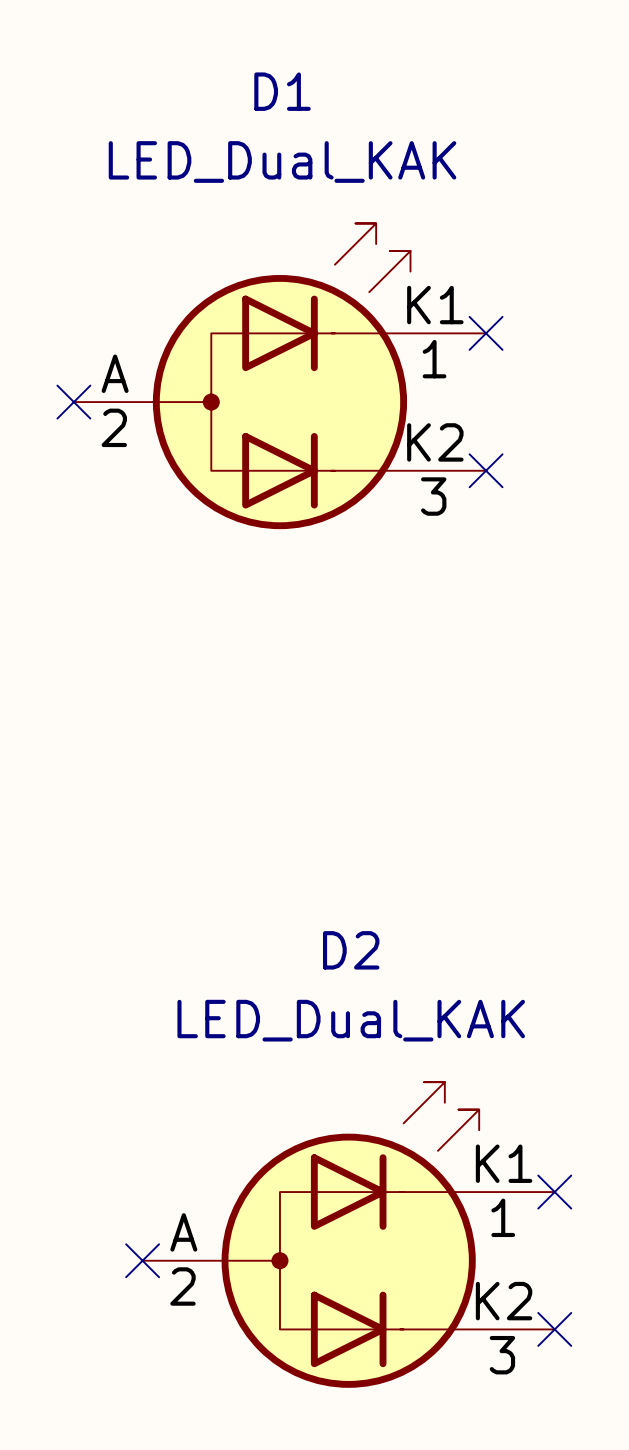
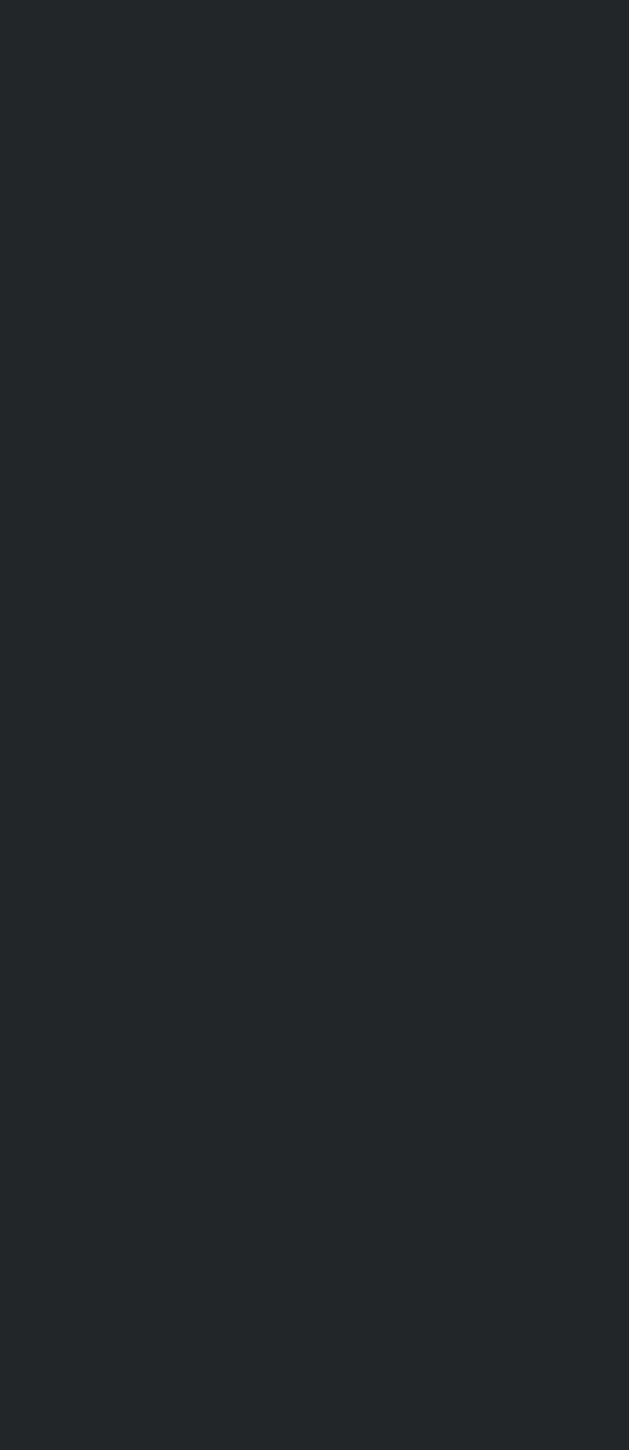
no-connect mark: (486, 333) -> none
D1: LED_Dual_KAK (279, 376) -> none
no-connect mark: (73, 402) -> none
no-connect mark: (486, 470) -> none
no-connect mark: (554, 1192) -> none
D2: LED_Dual_KAK (348, 1234) -> none
no-connect mark: (142, 1260) -> none
no-connect mark: (554, 1329) -> none

